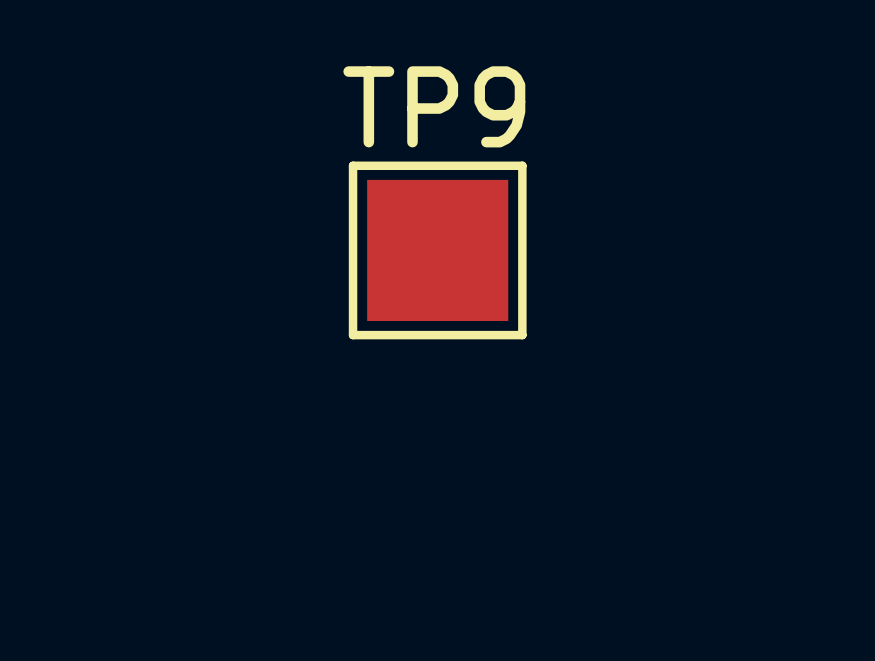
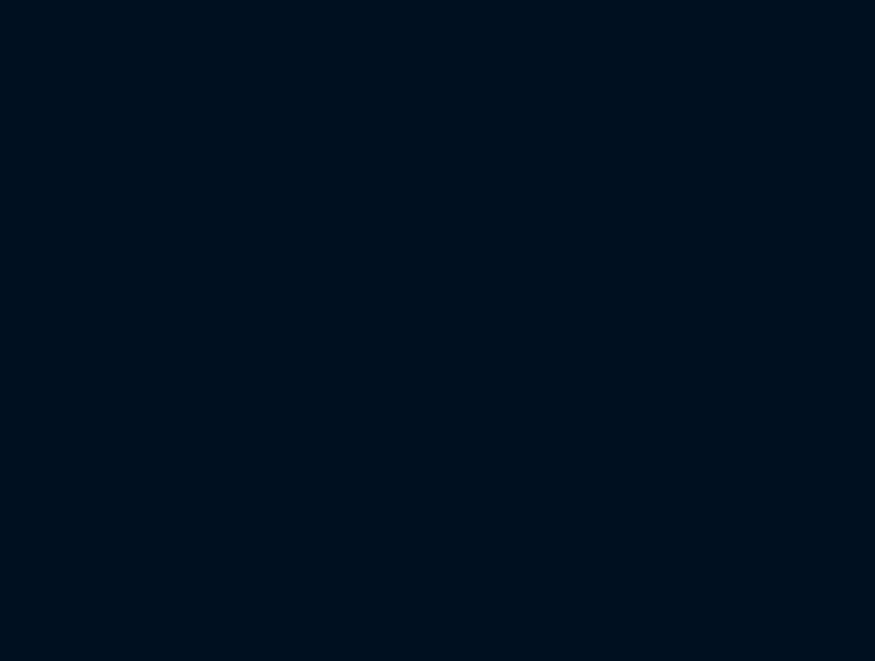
TP9: (437, 250) -> none

